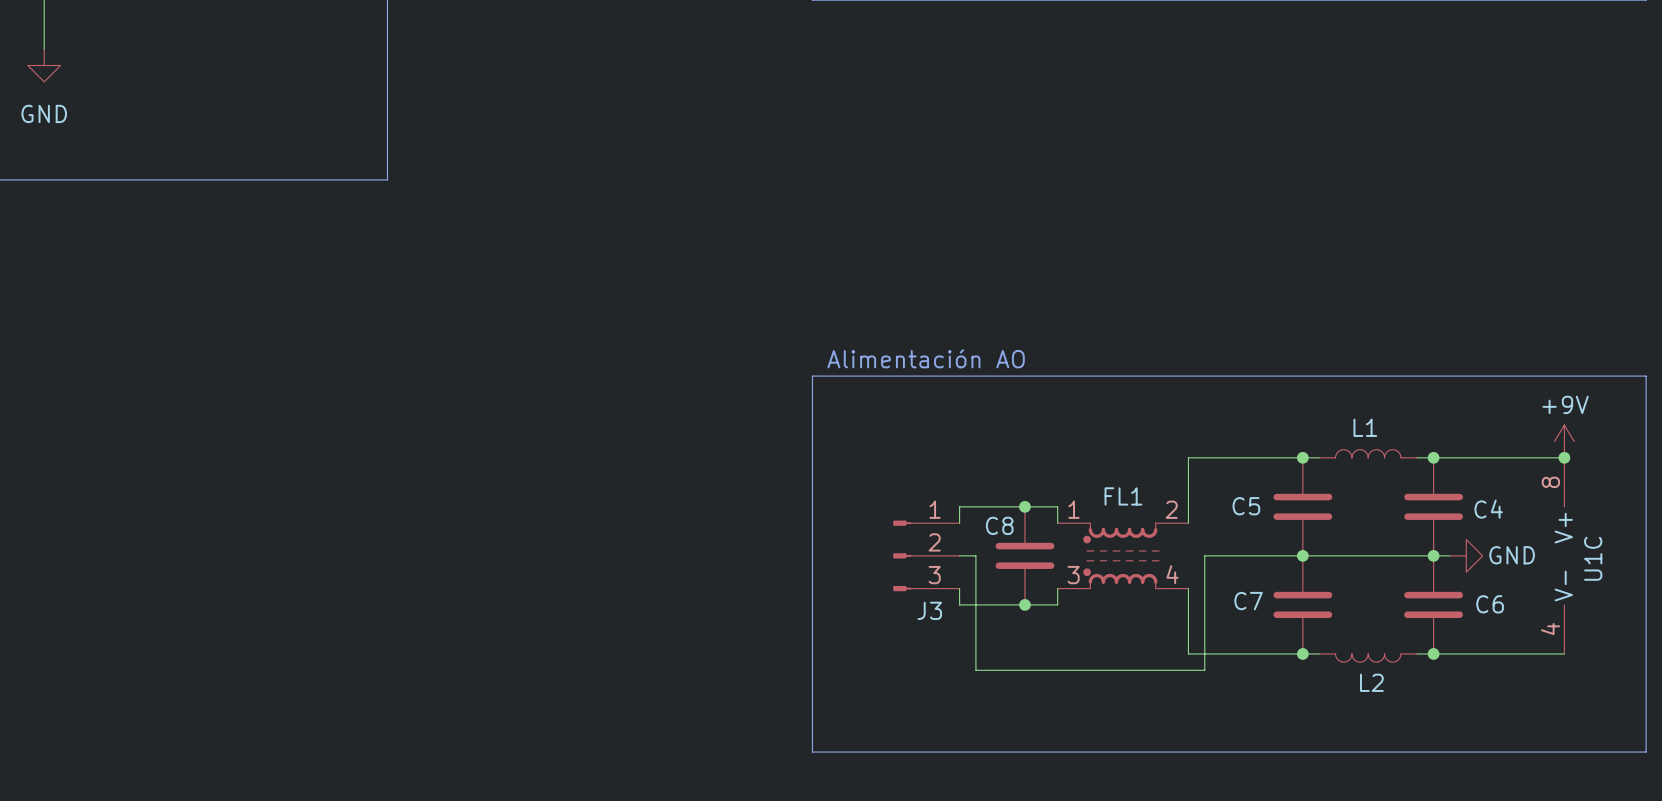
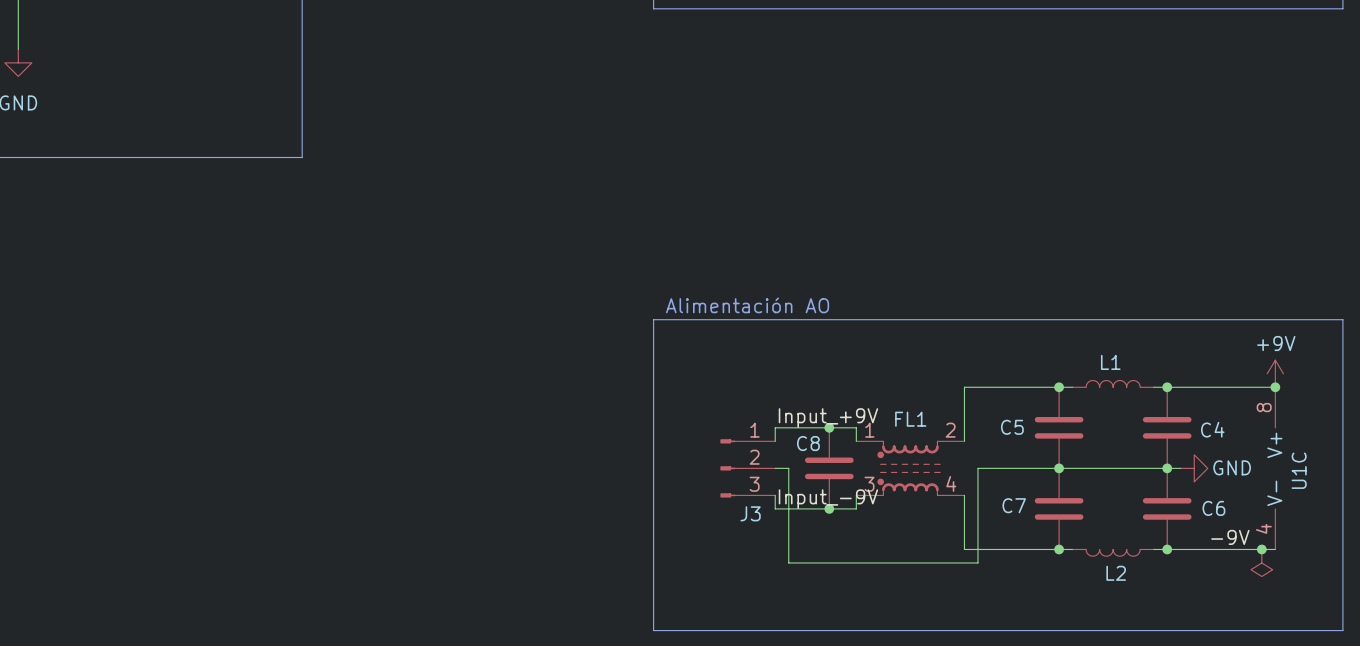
label: none -> Input_+9V (828, 418)
label: none -> Input_-9V (828, 499)
label: none -> -9V (1230, 537)
junction: none -> (1261, 549)
power symbol: none -> (1261, 562)

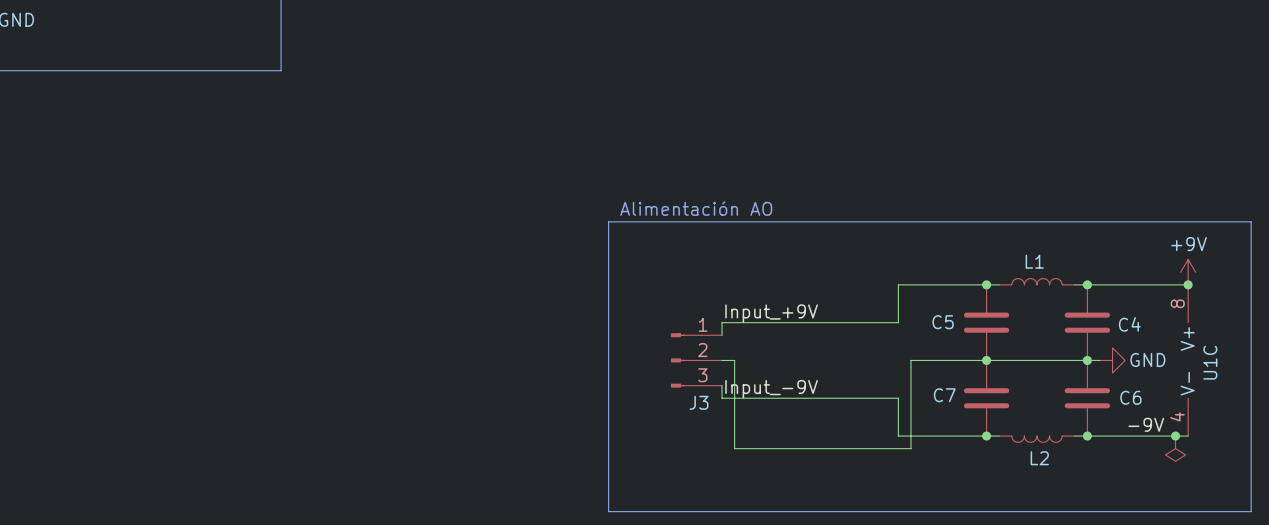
junction: (829, 427) -> none
wire: (856, 427) (856, 441) -> (797, 322) (898, 322)
wire: (964, 427) (964, 441) -> none
C8: (829, 468) -> none
FL1: (910, 468) -> none
wire: (856, 495) (856, 508) -> (898, 398) (797, 398)
wire: (964, 495) (964, 508) -> none
junction: (829, 508) -> none

